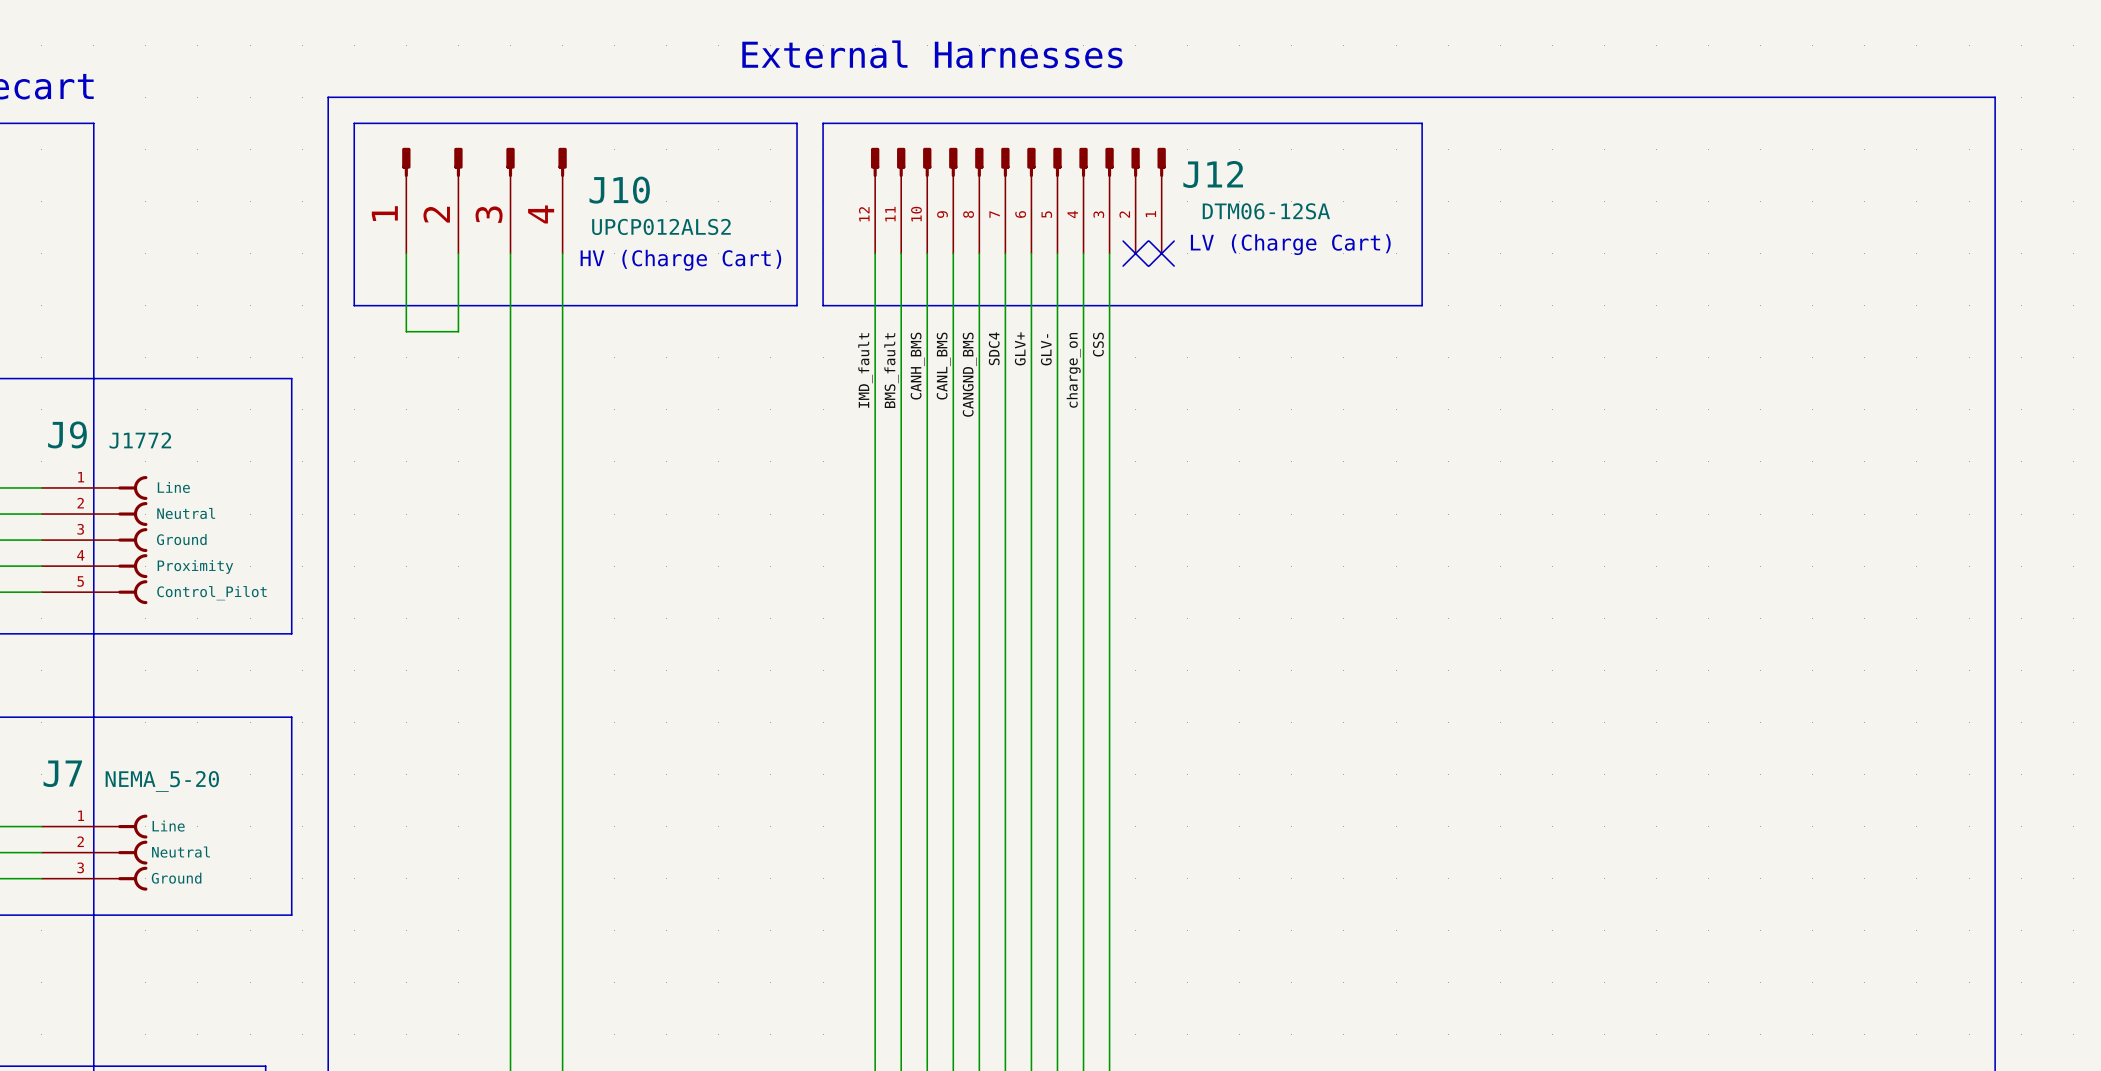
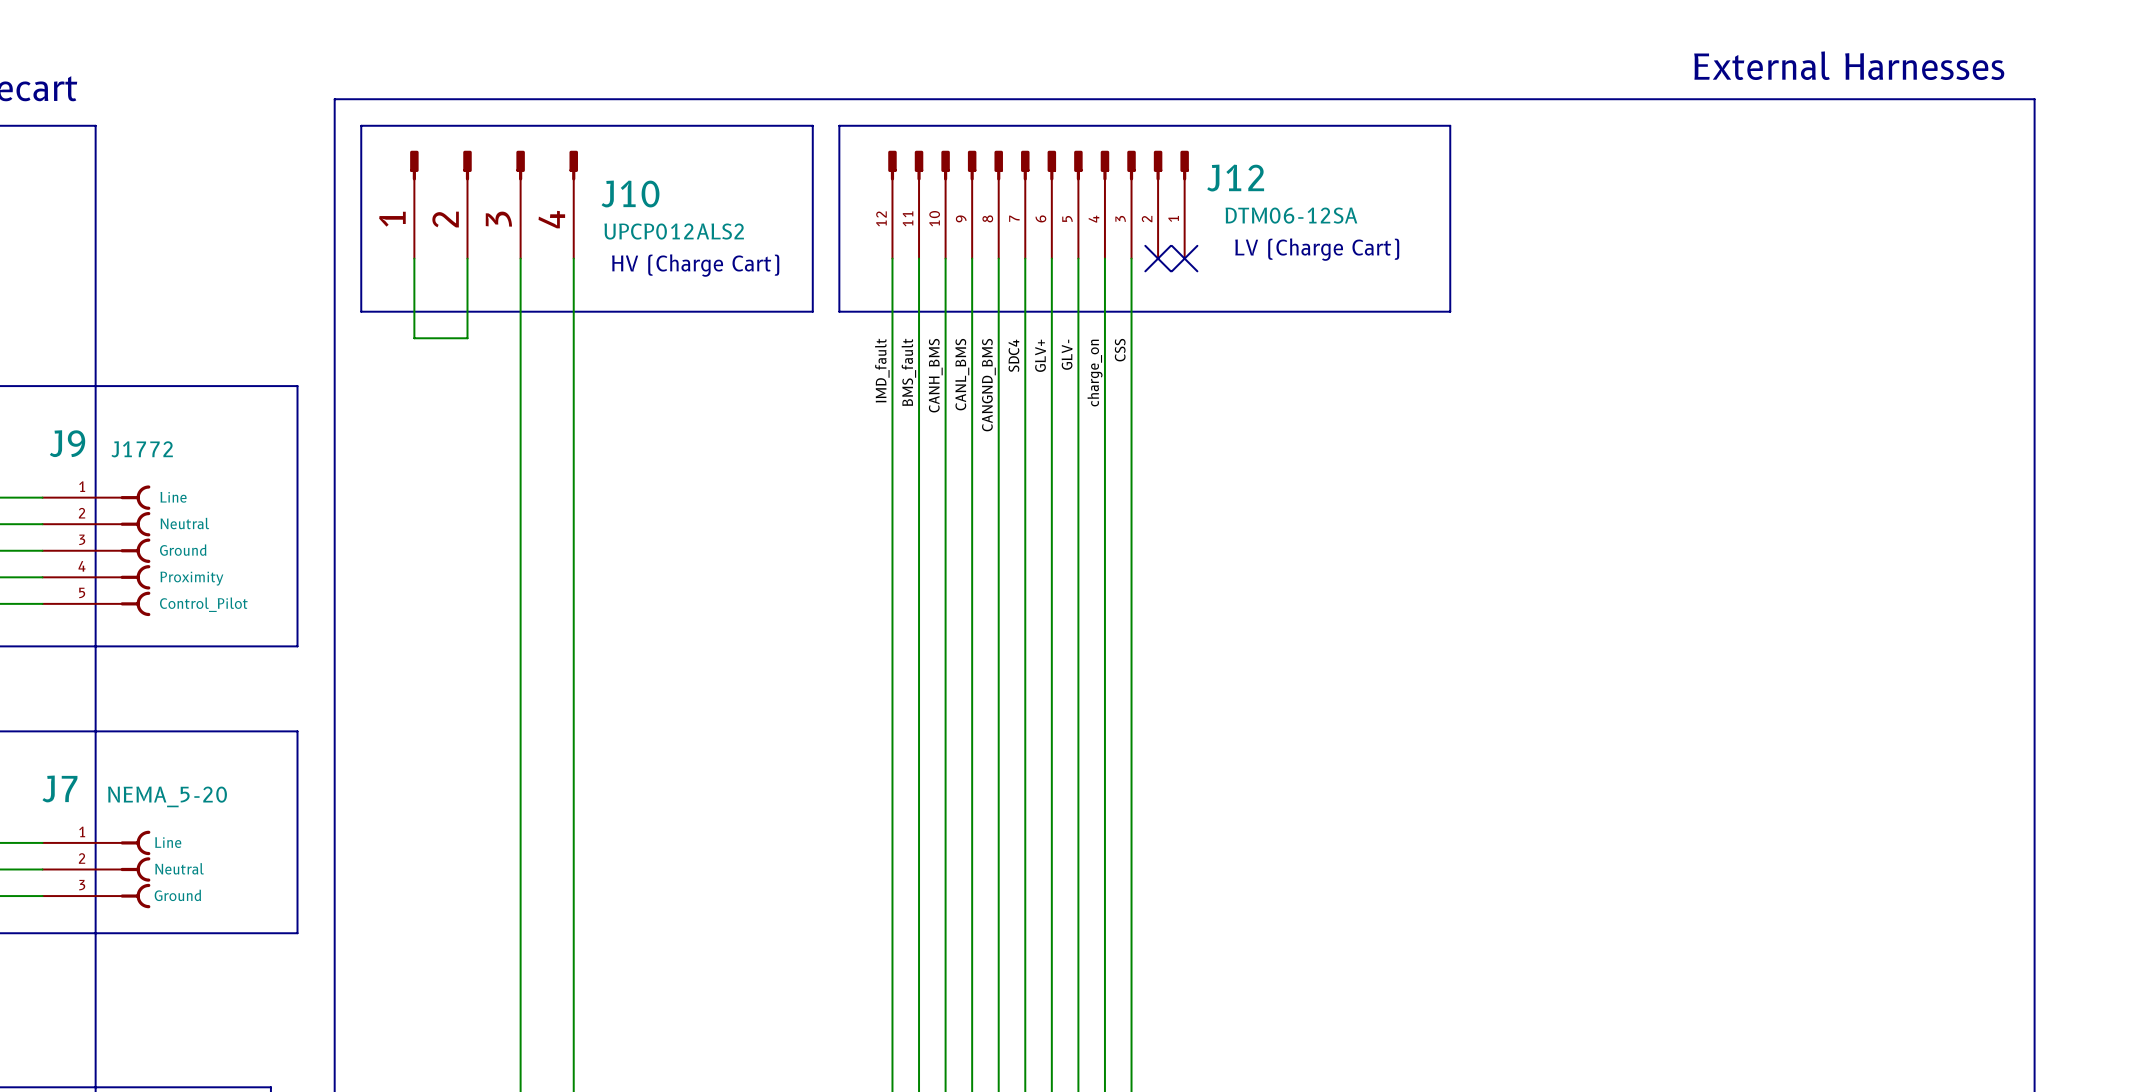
text: External Harnesses (932, 54) -> none
text: none -> External Harnesses (1849, 65)

